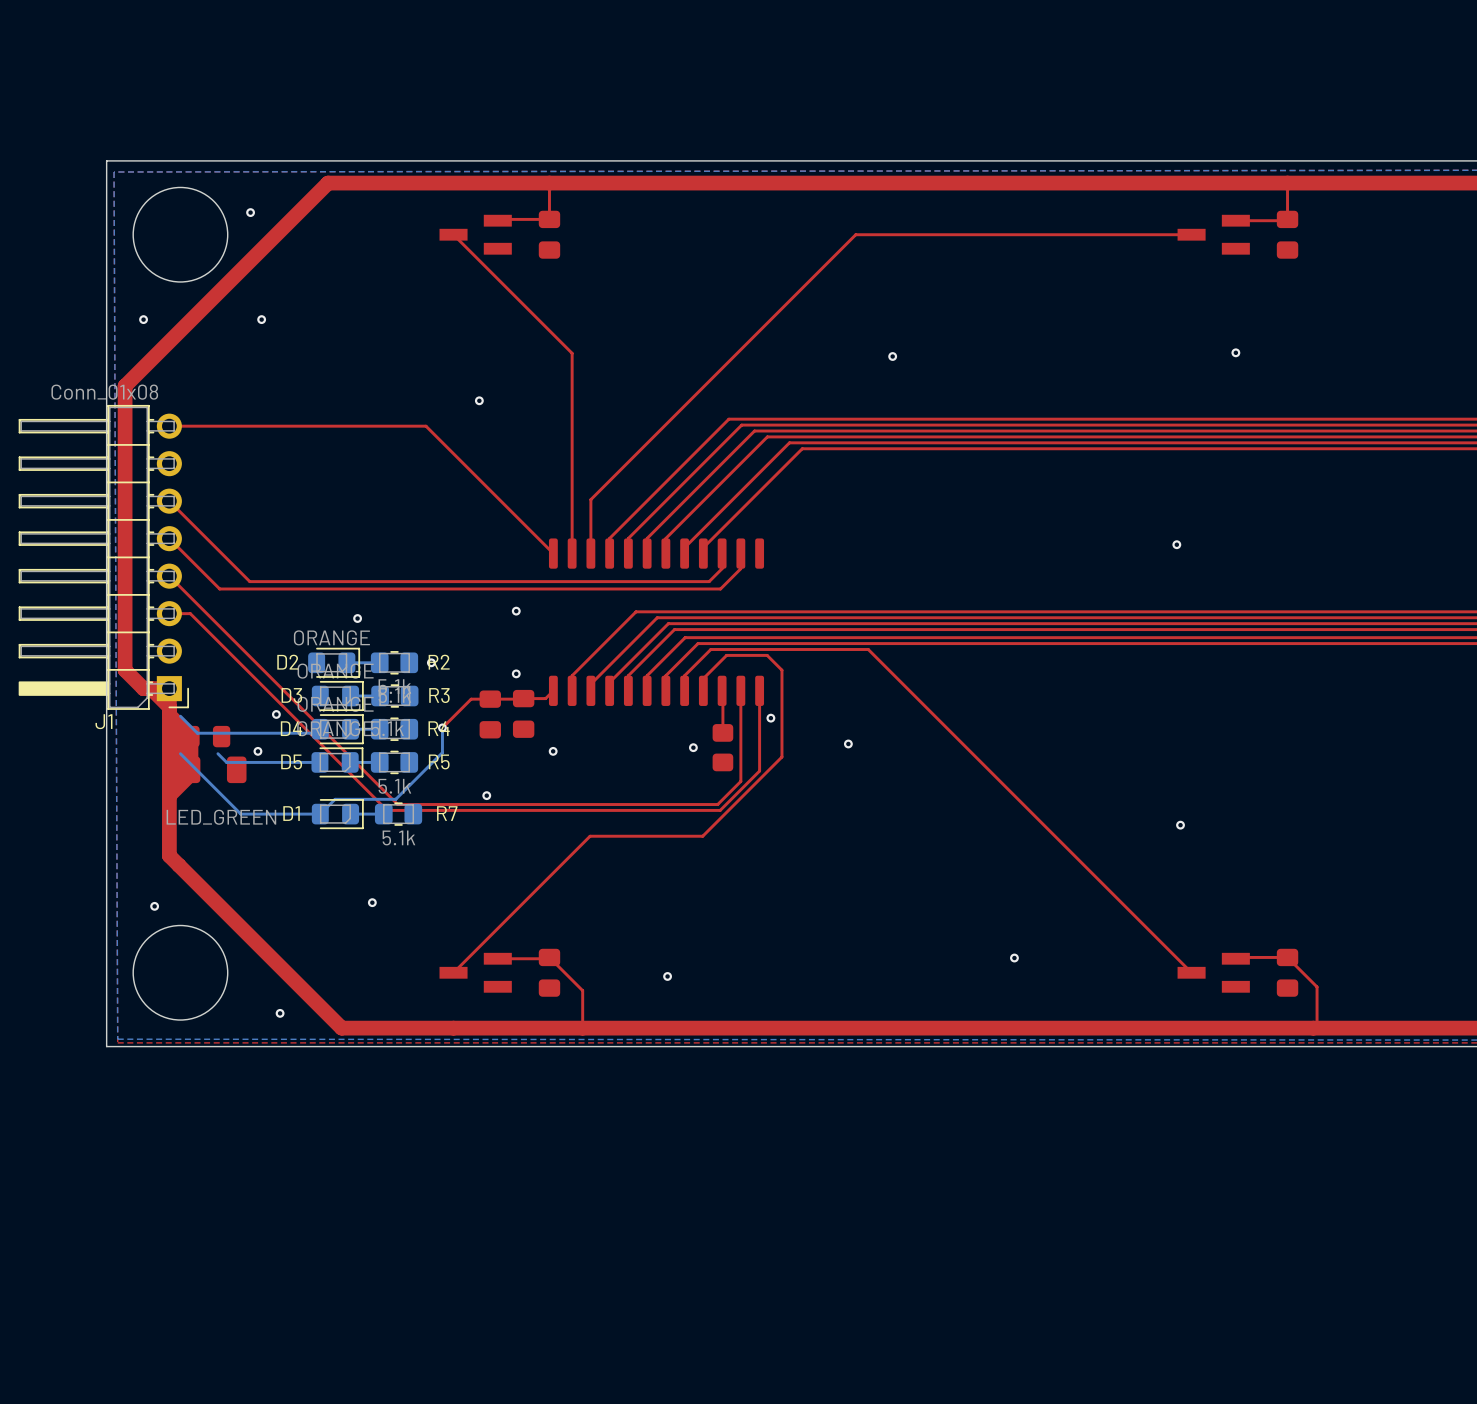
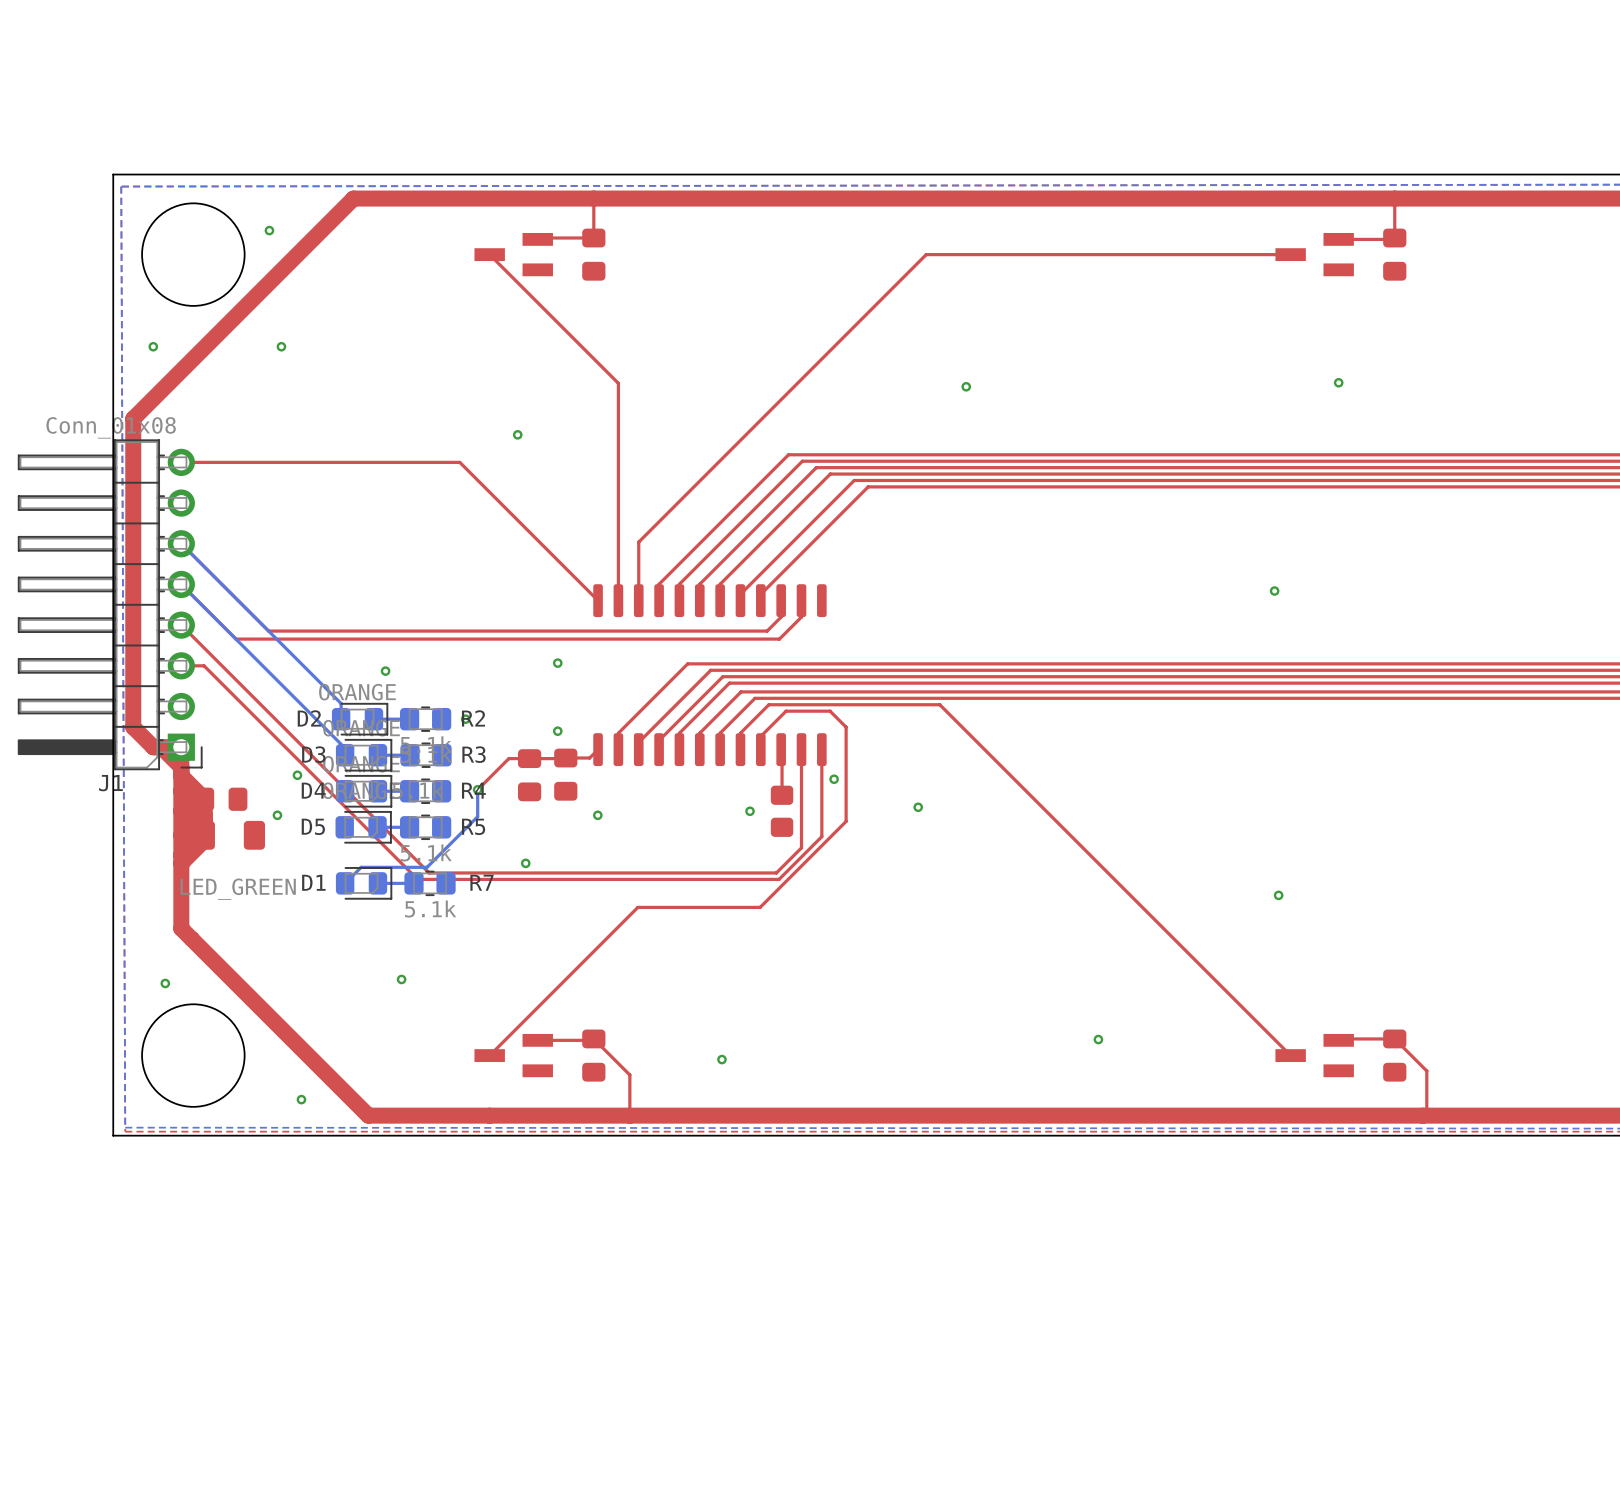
bottom track: none -> (181, 543) (341, 703) (341, 719)
bottom track: none -> (181, 584) (345, 748) (345, 755)
bottom track: (180, 716) (197, 733) (316, 733) -> none
bottom track: (180, 753) (240, 814) (320, 814) -> none
bottom track: (217, 753) (226, 762) (319, 762) -> none

